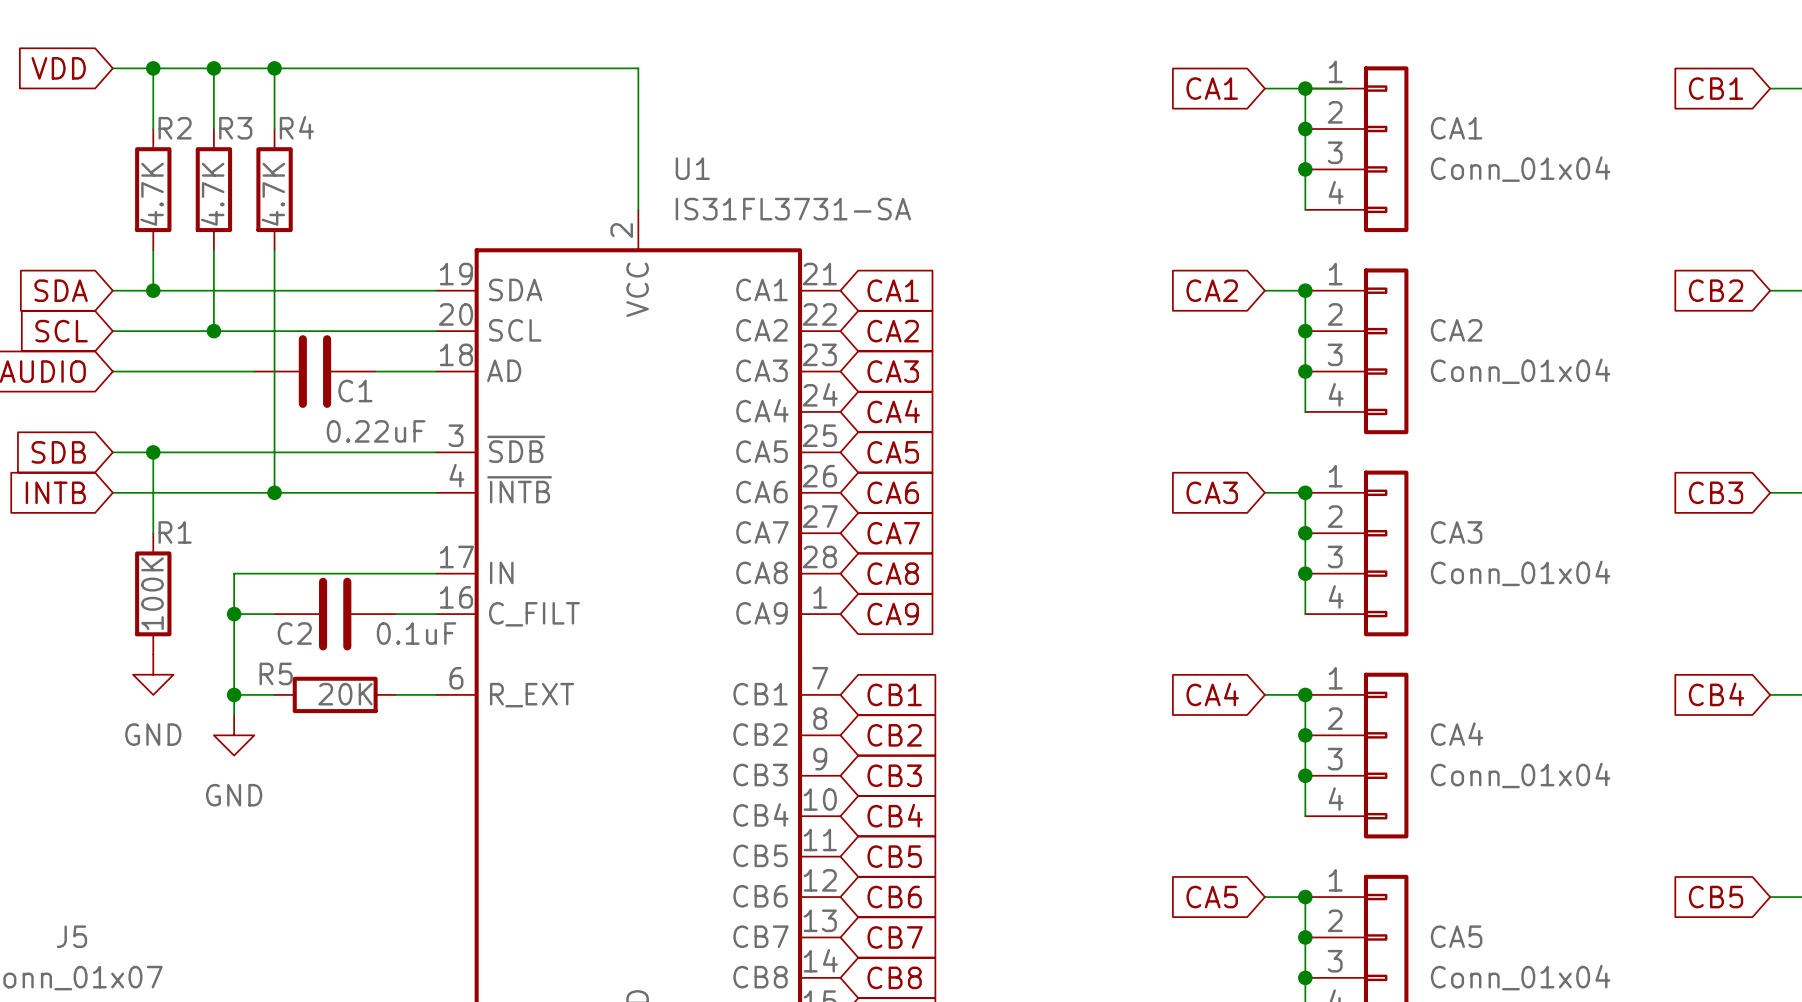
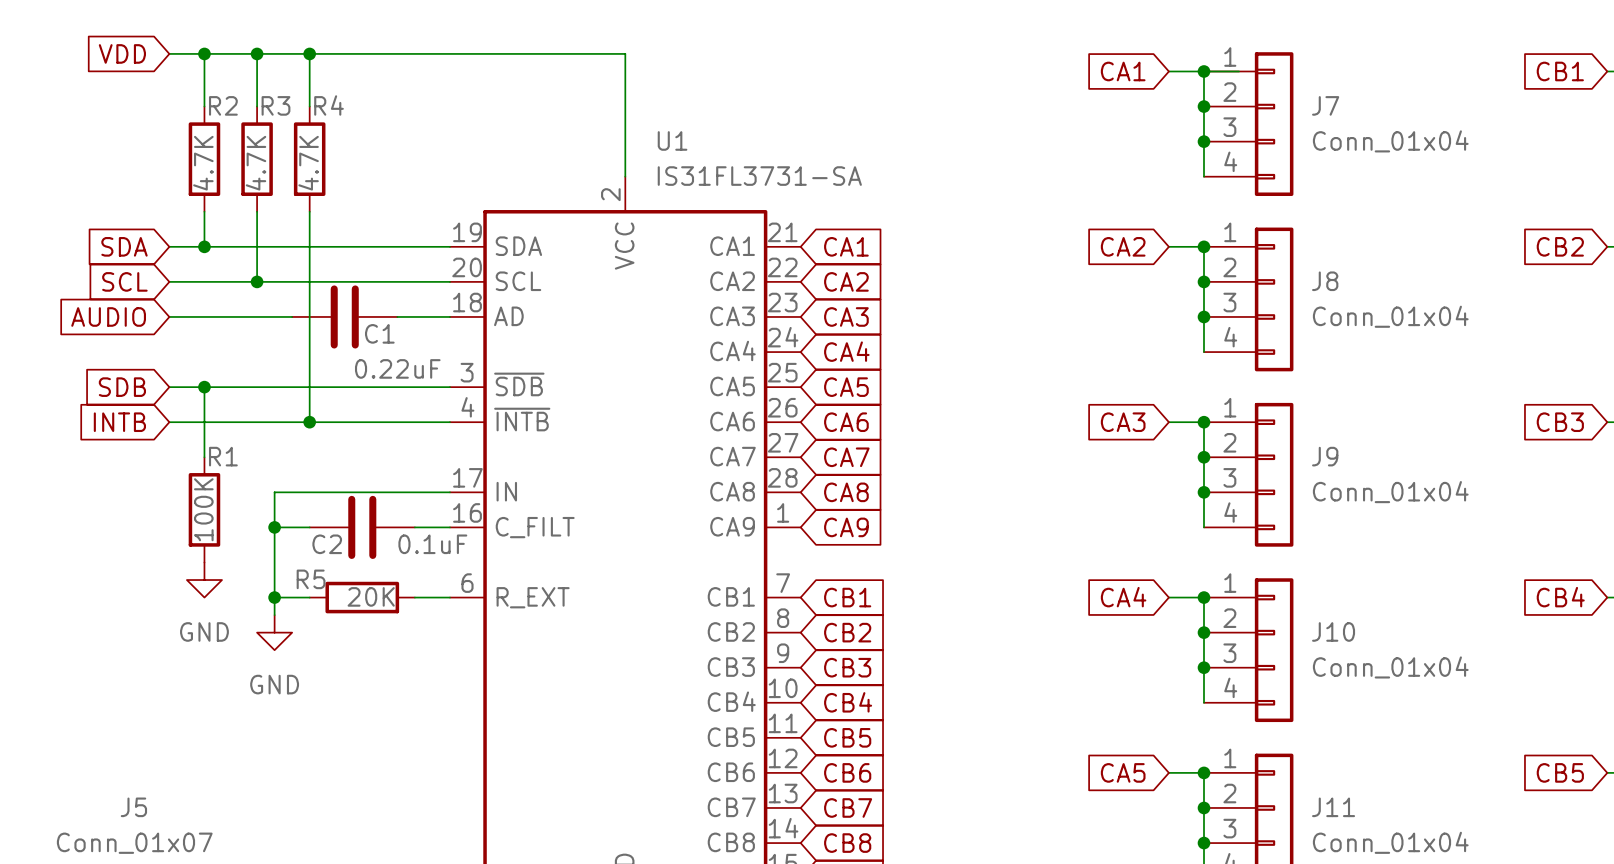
CA1 name: CA1 (1456, 128) -> J7 (1325, 105)
CA2 name: CA2 (1456, 330) -> J8 (1325, 281)
CA3 name: CA3 (1456, 532) -> J9 (1325, 456)
CA4 name: CA4 (1457, 734) -> J10 (1333, 631)
CA5 name: CA5 (1456, 936) -> J11 (1333, 807)

